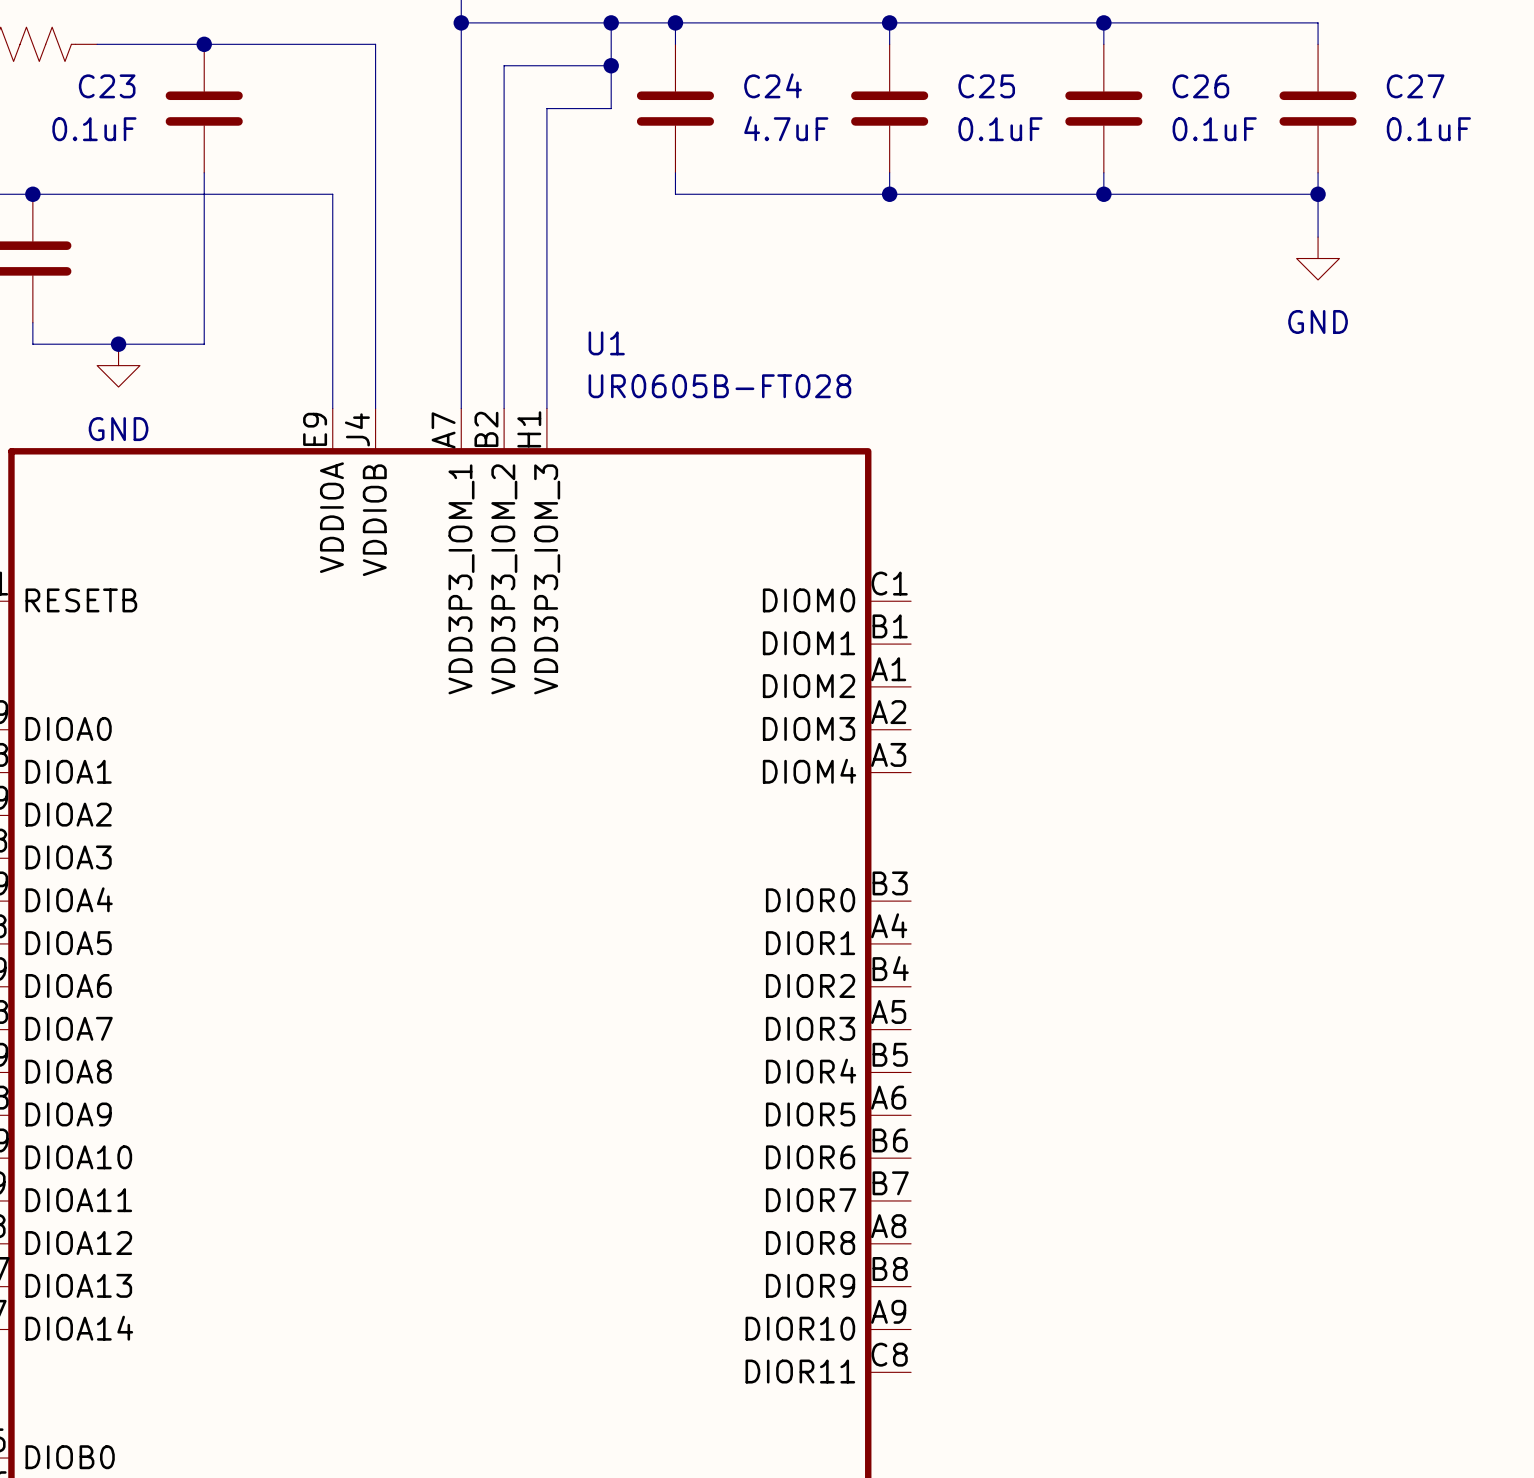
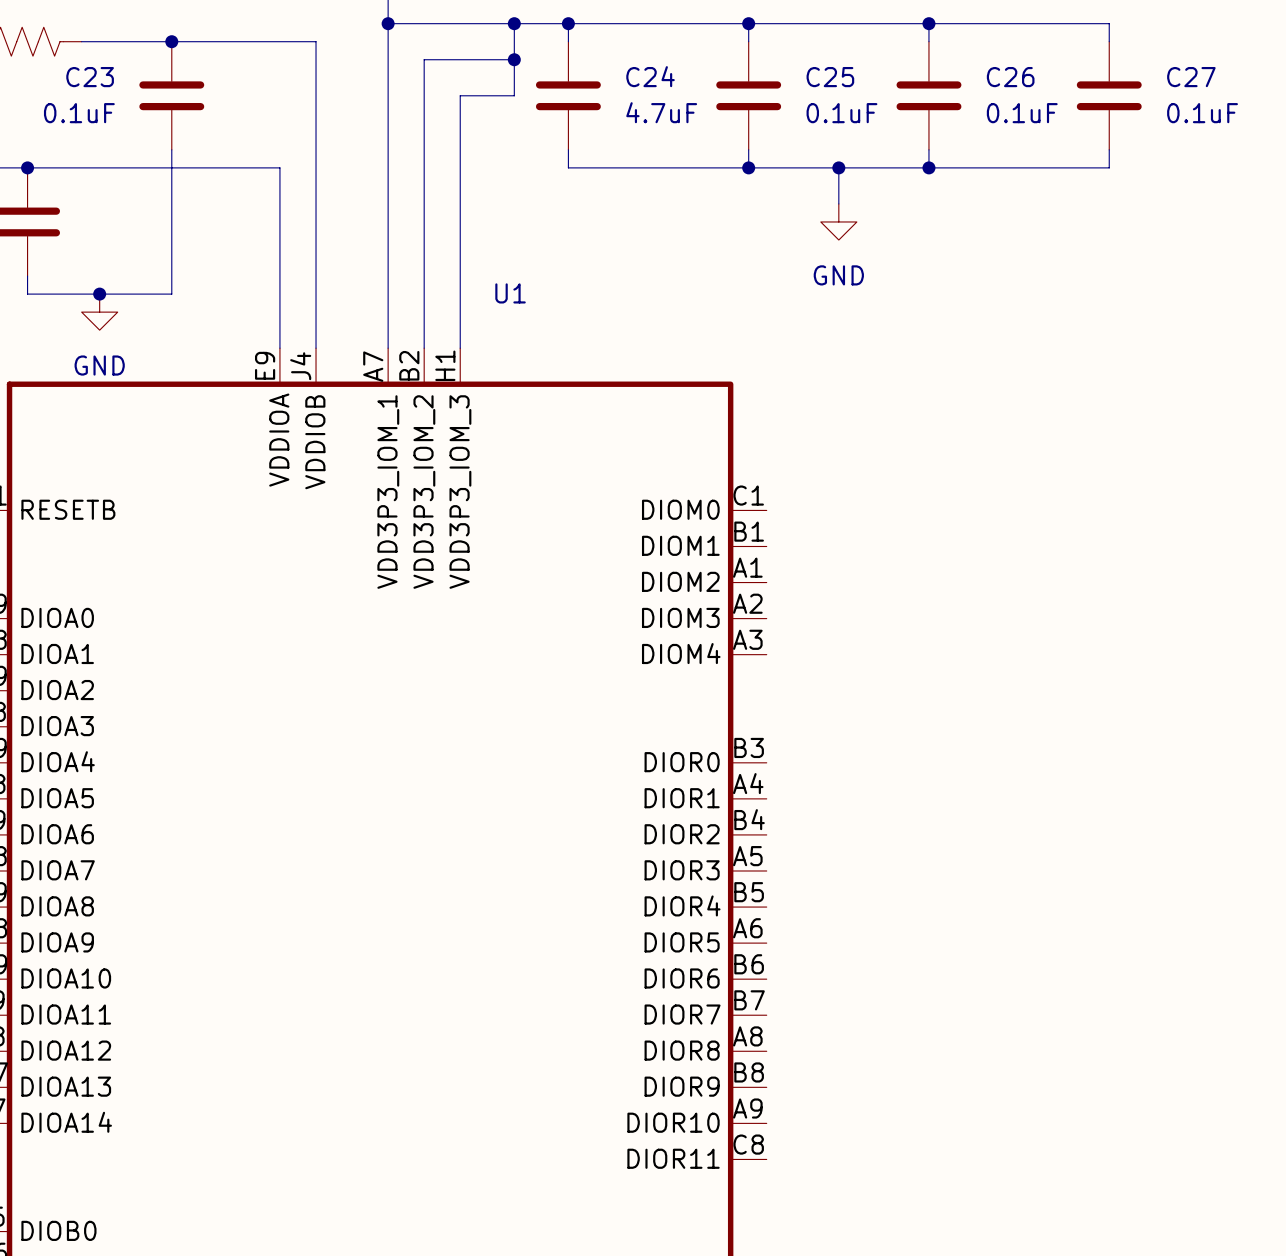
junction: none -> (838, 167)
wire: (1318, 194) (1318, 237) -> (838, 167) (838, 203)
junction: (1318, 194) -> none
power symbol position: GND (1318, 258) -> GND (838, 221)
U1 value: UR0605B-FT028 (719, 386) -> none

